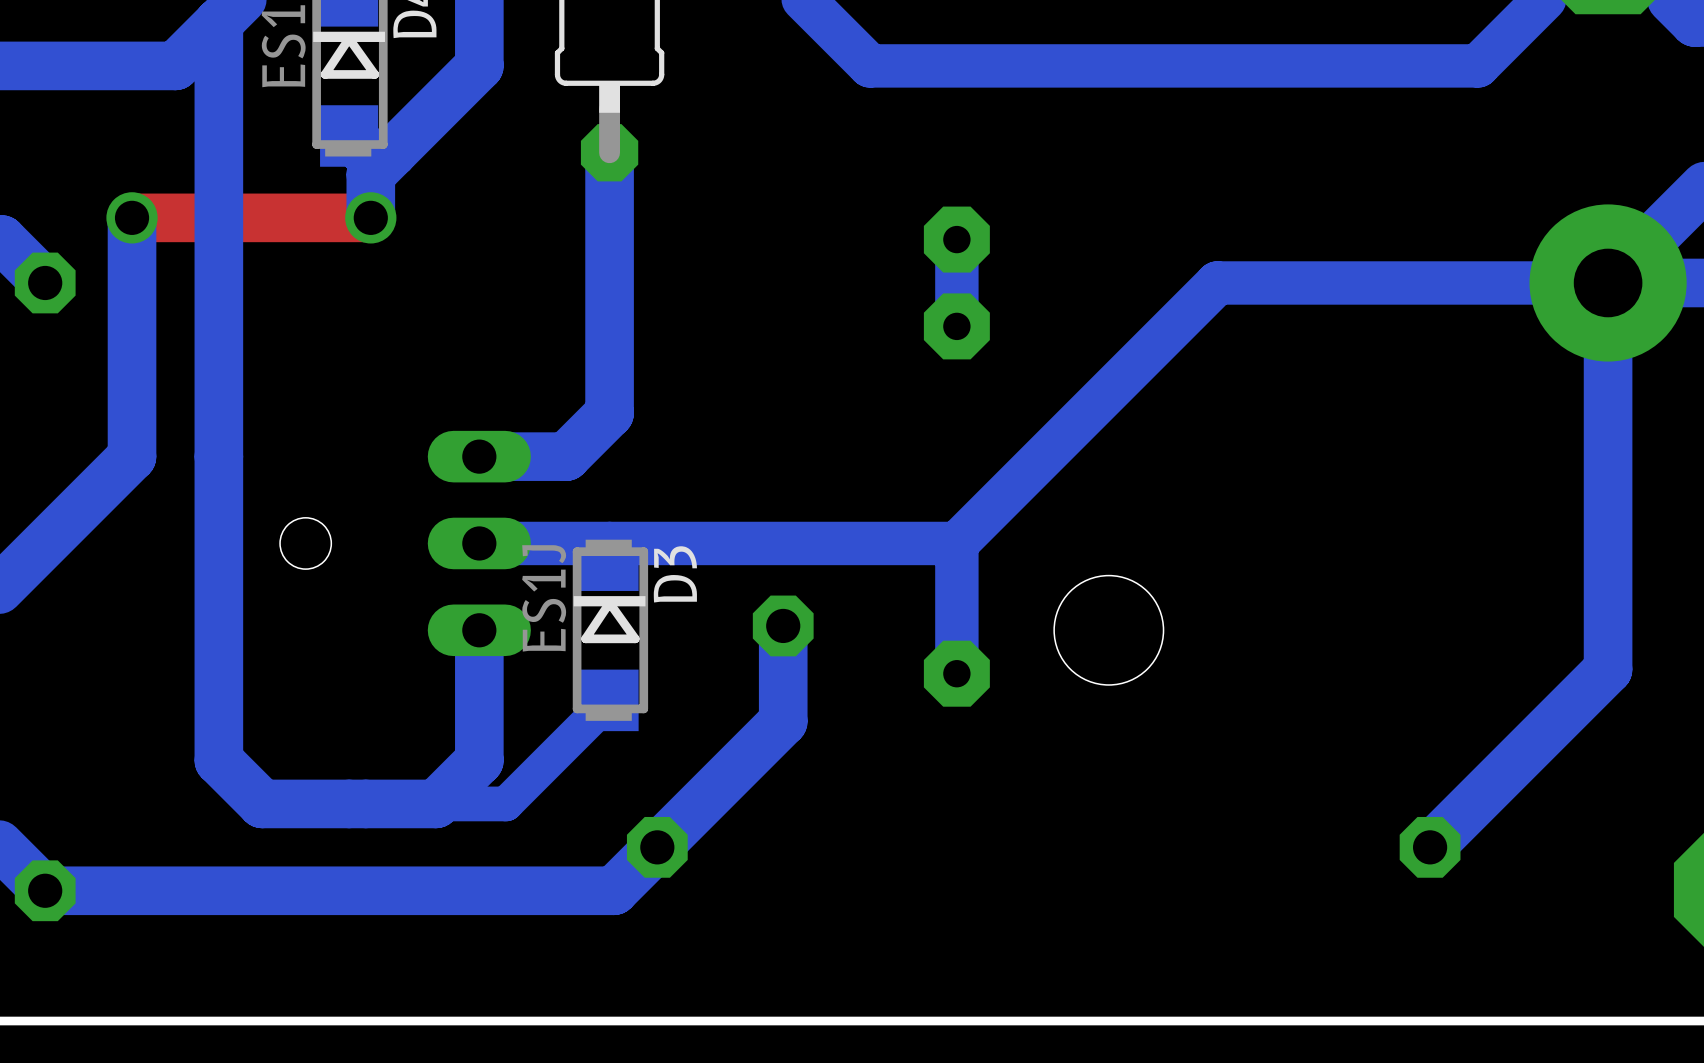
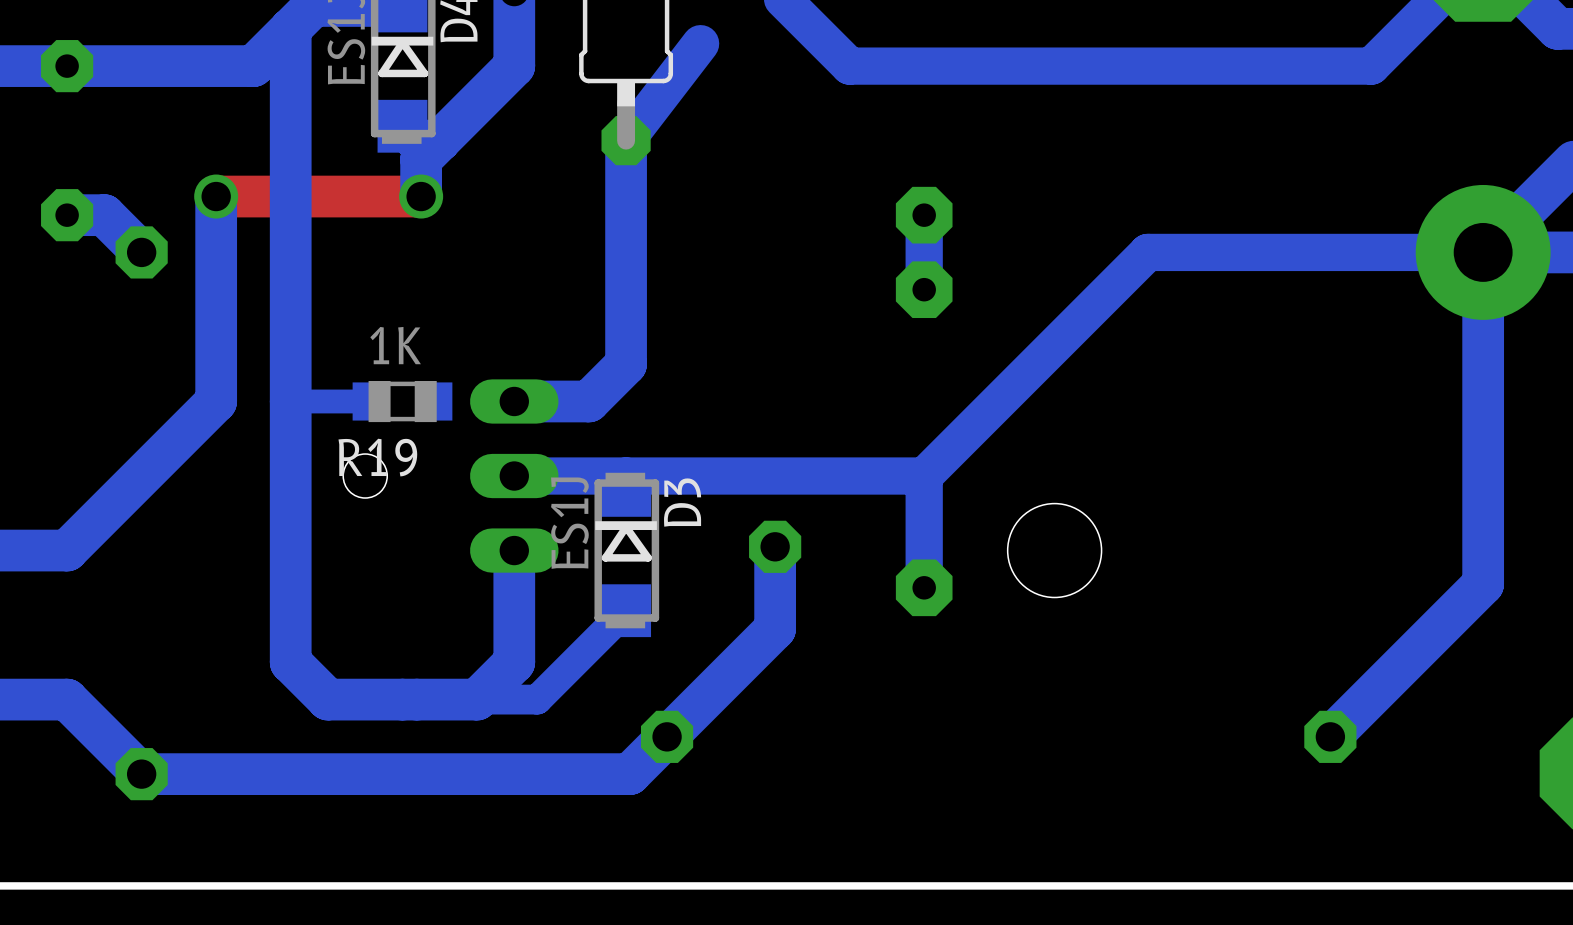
bottom track: none -> (700, 43) (626, 140)
bottom track: none -> (368, 401) (290, 401)
R19: none -> 1K (402, 401)

